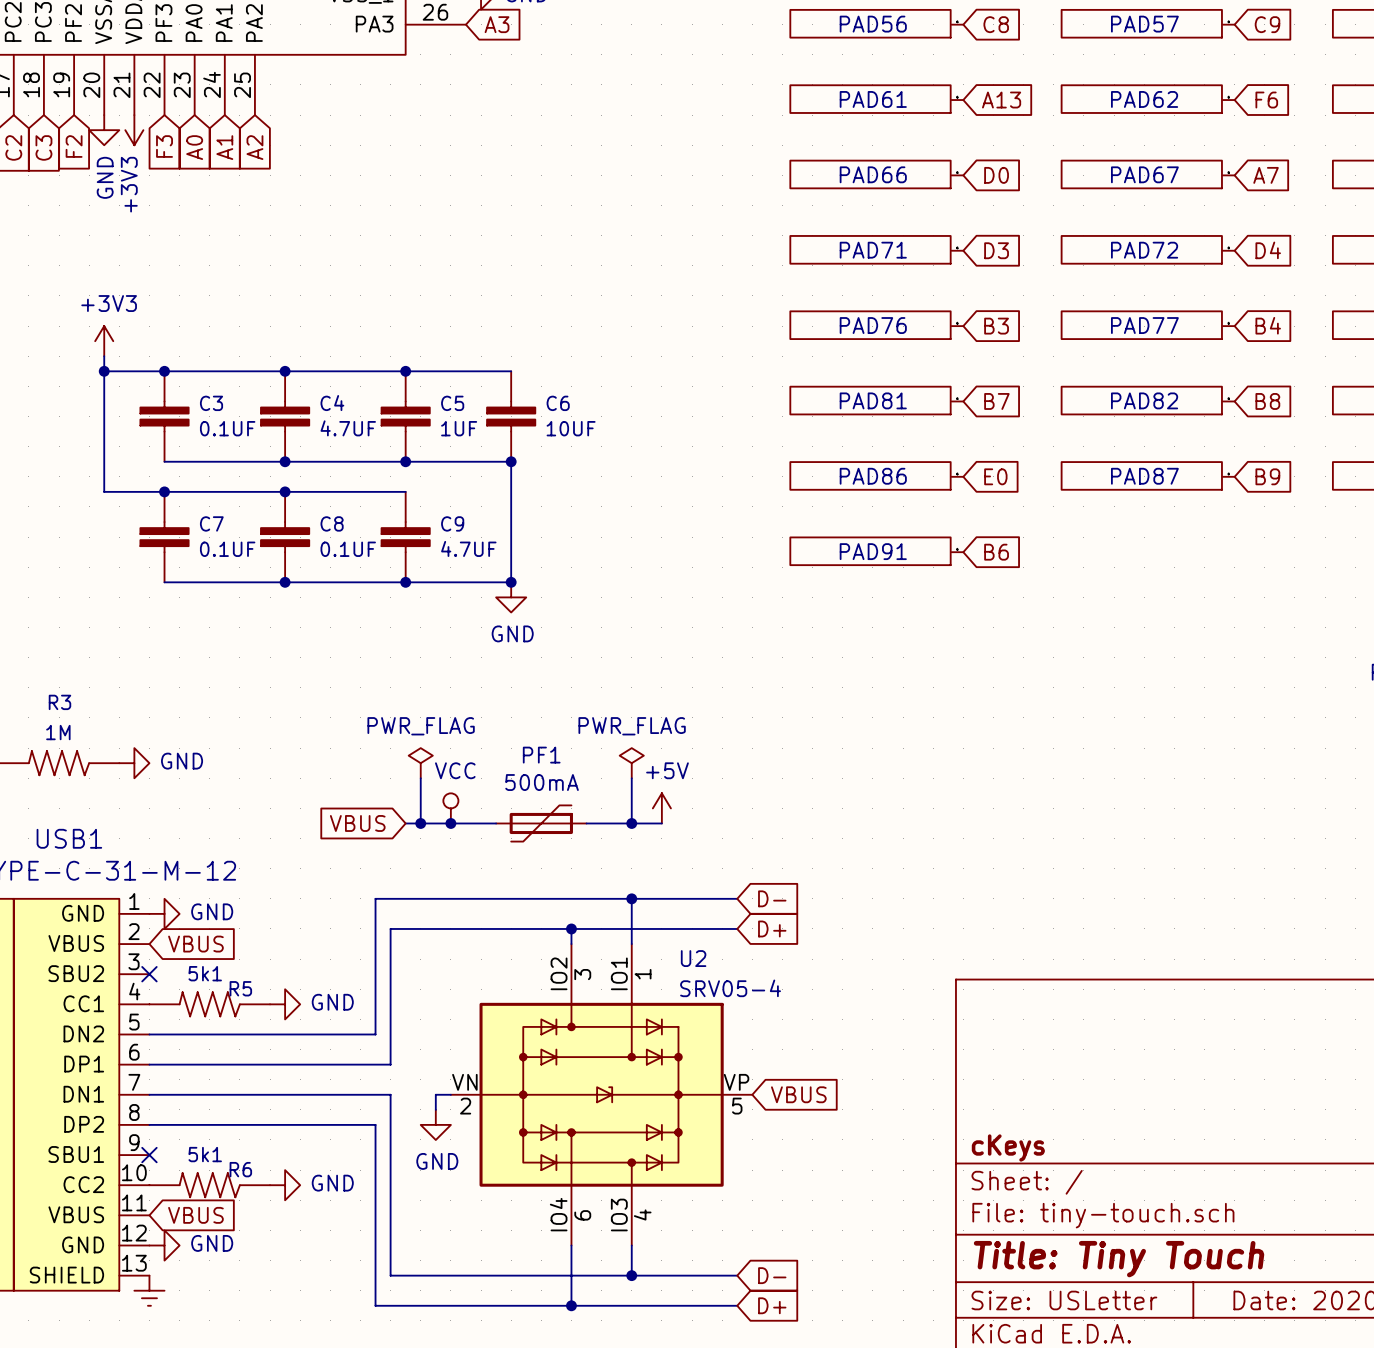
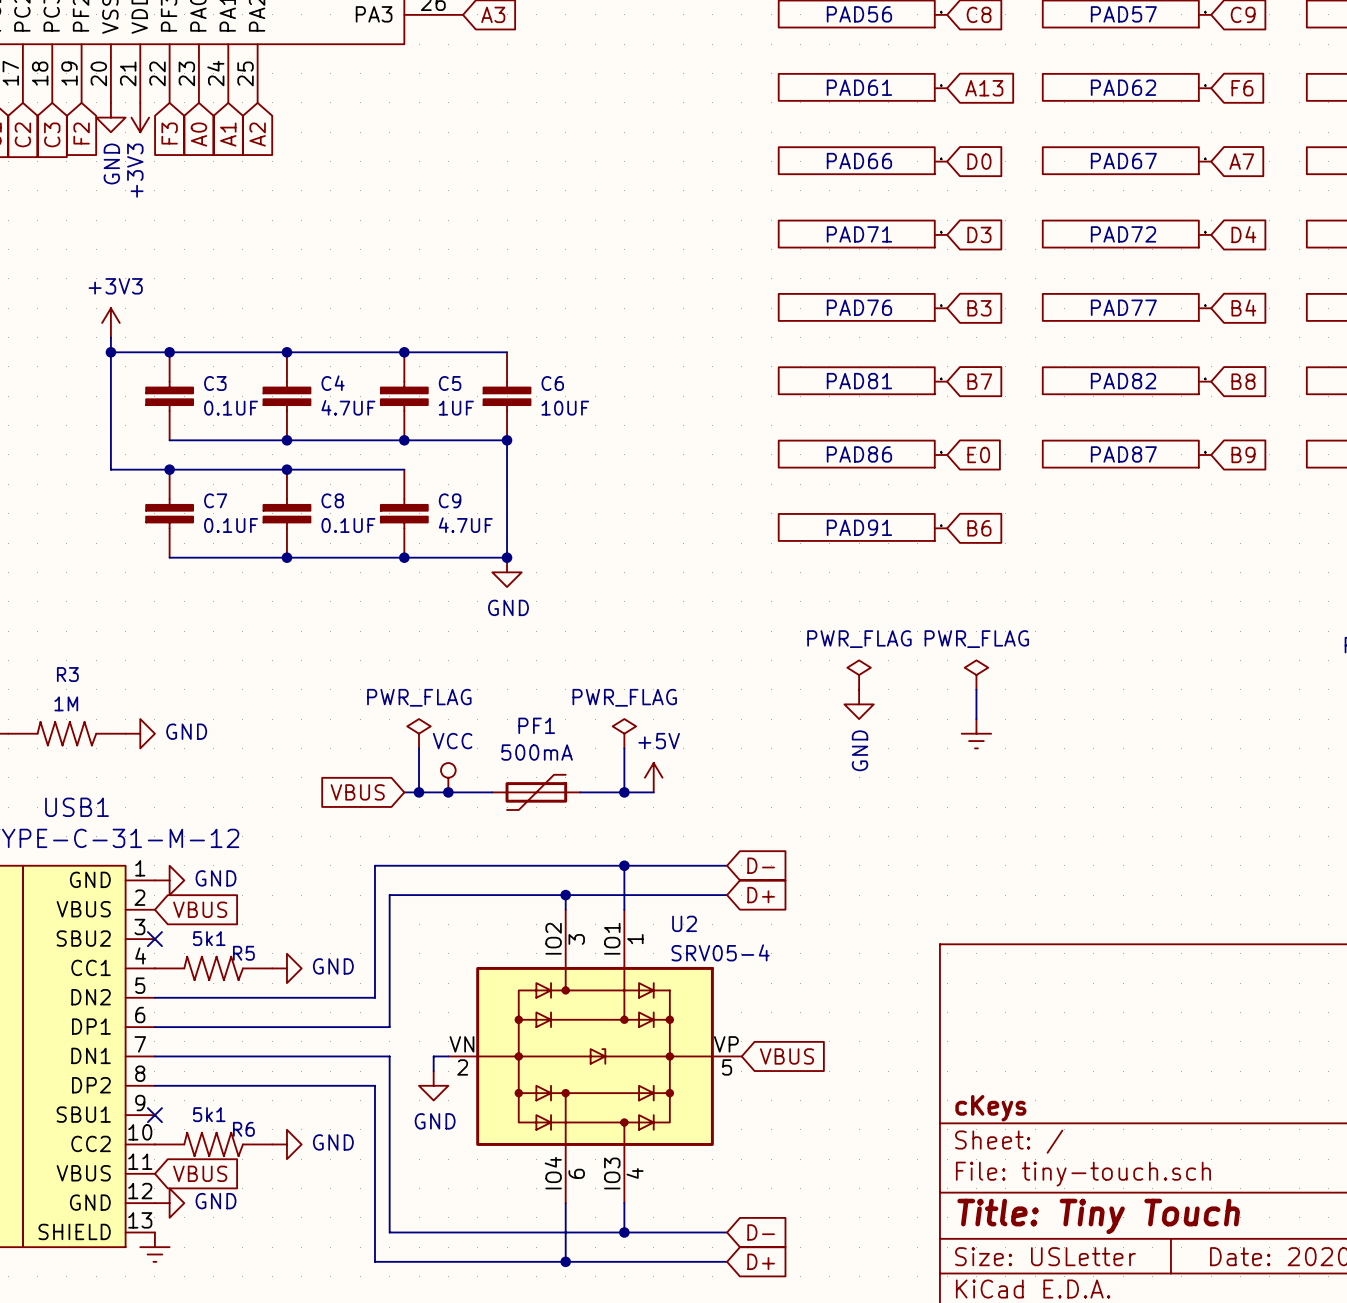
power symbol: none -> PWR_FLAG (859, 675)
power symbol: none -> PWR_FLAG (976, 675)
wire: none -> (976, 689) (976, 719)
power symbol: none -> GND (859, 704)
power symbol: none -> (976, 733)

